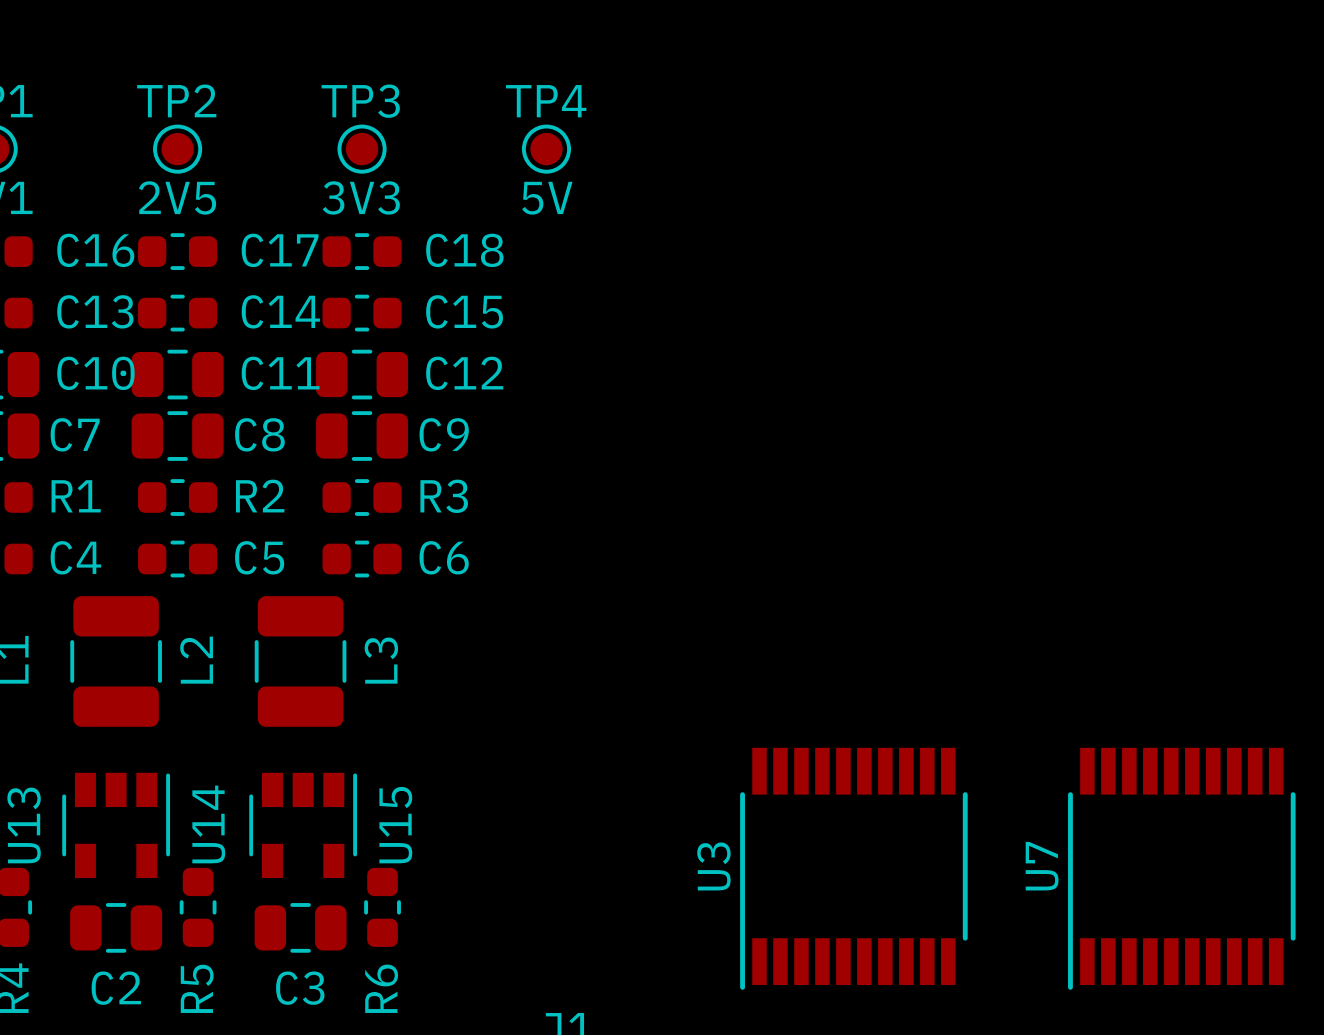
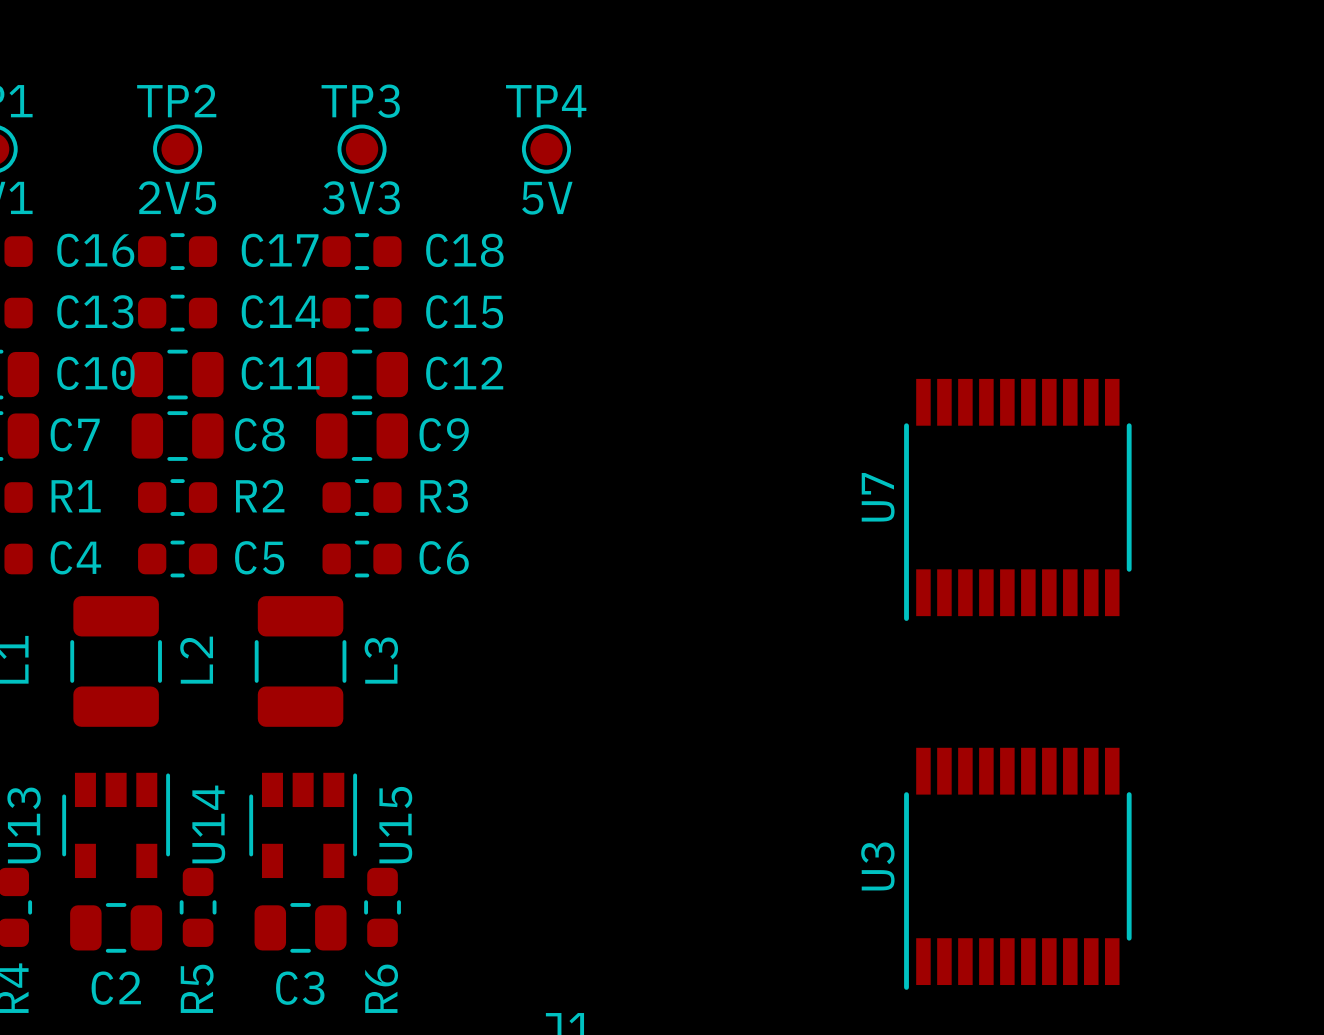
U3 position: (853, 868) -> (1017, 868)
U7 position: (1181, 868) -> (1017, 499)

